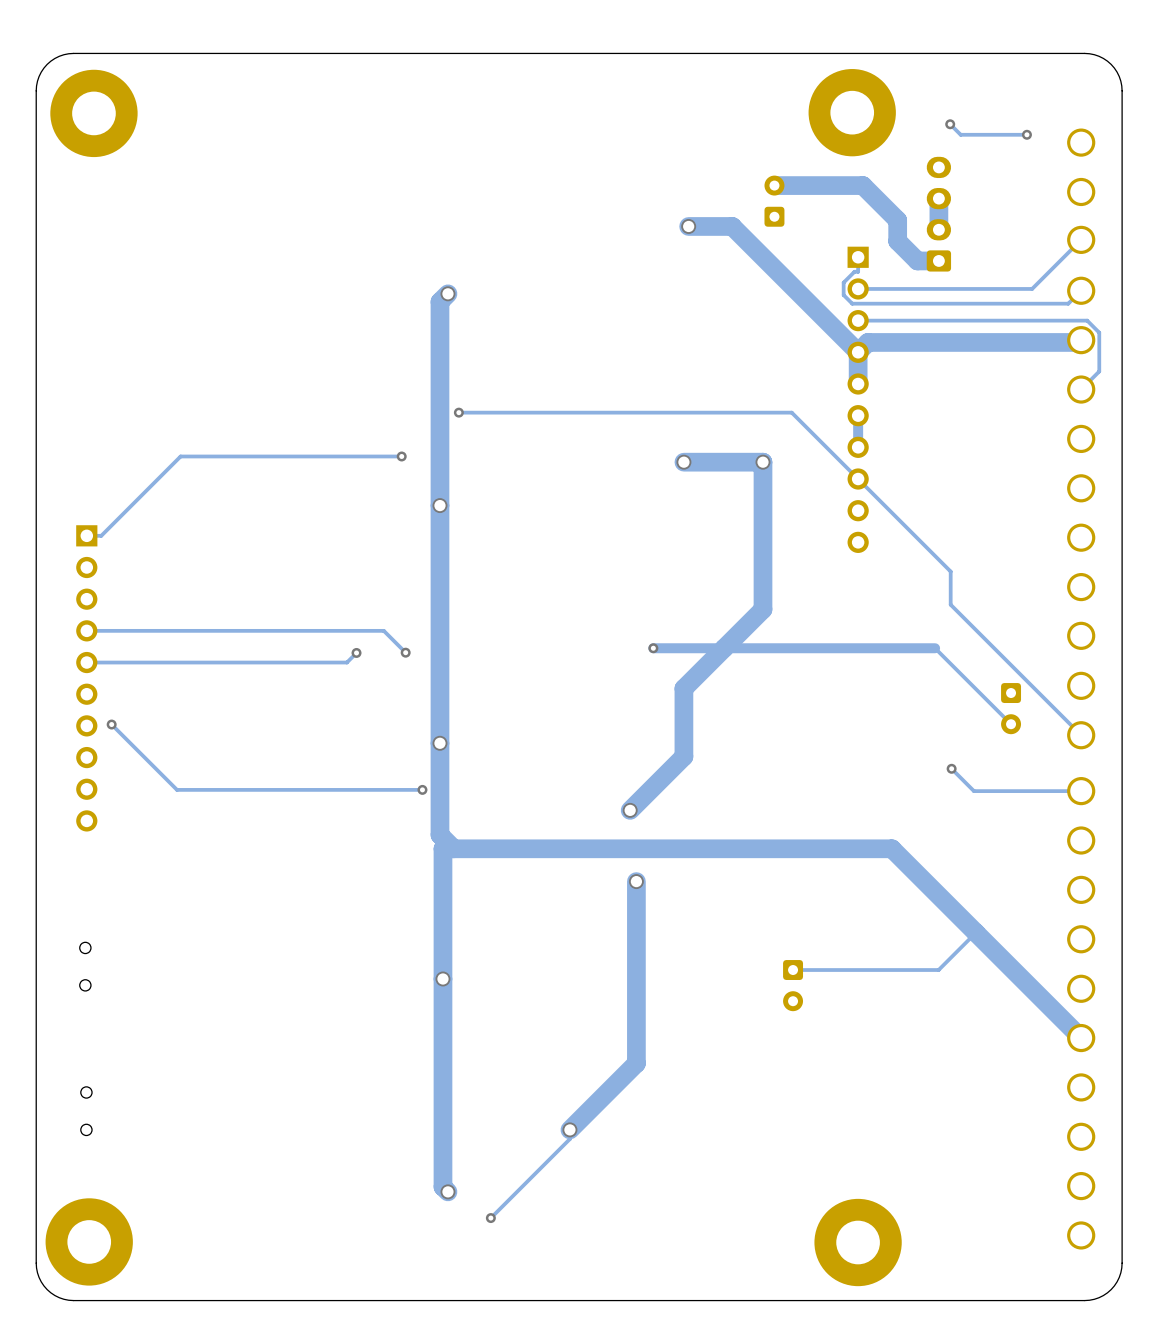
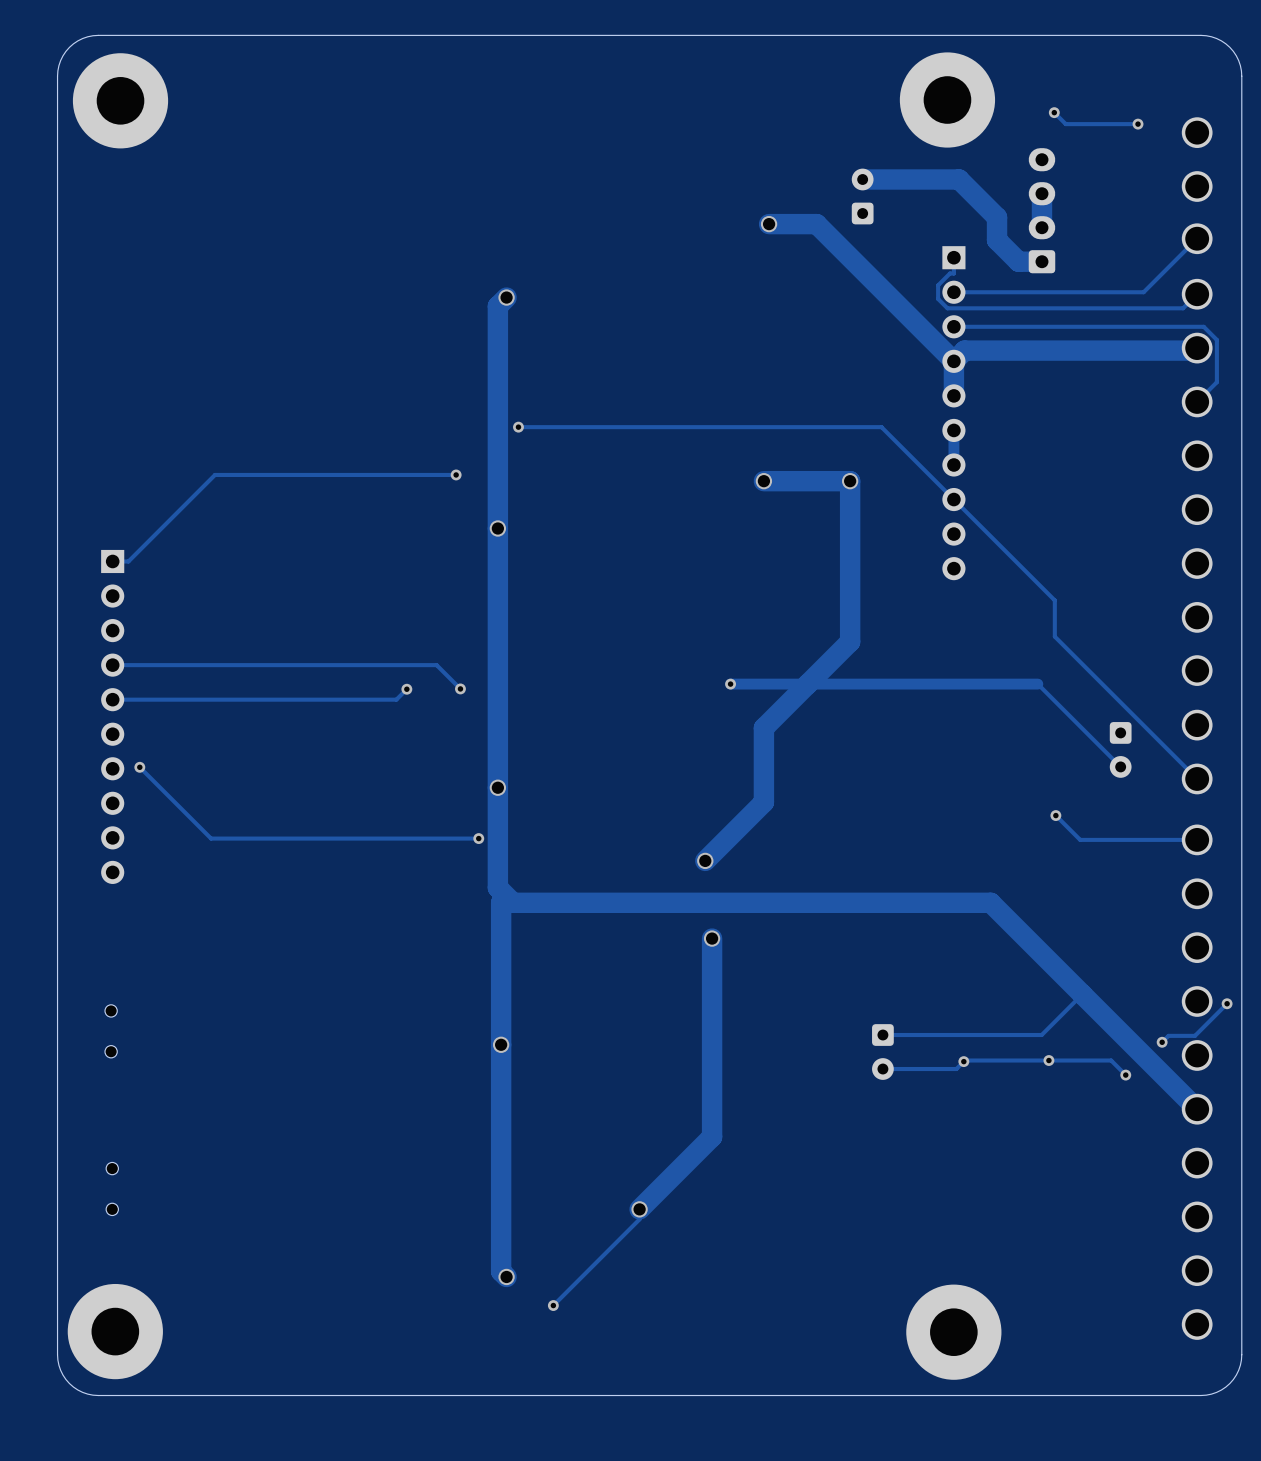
track: none -> (1227, 1003) (1194, 1035) (1168, 1035) (1162, 1042)
via: none -> (1227, 1003)
via: none -> (1162, 1042)
via: none -> (1048, 1060)
via: none -> (963, 1061)
track: none -> (882, 1069) (956, 1069) (964, 1060) (1111, 1060) (1125, 1075)
via: none -> (1125, 1075)

